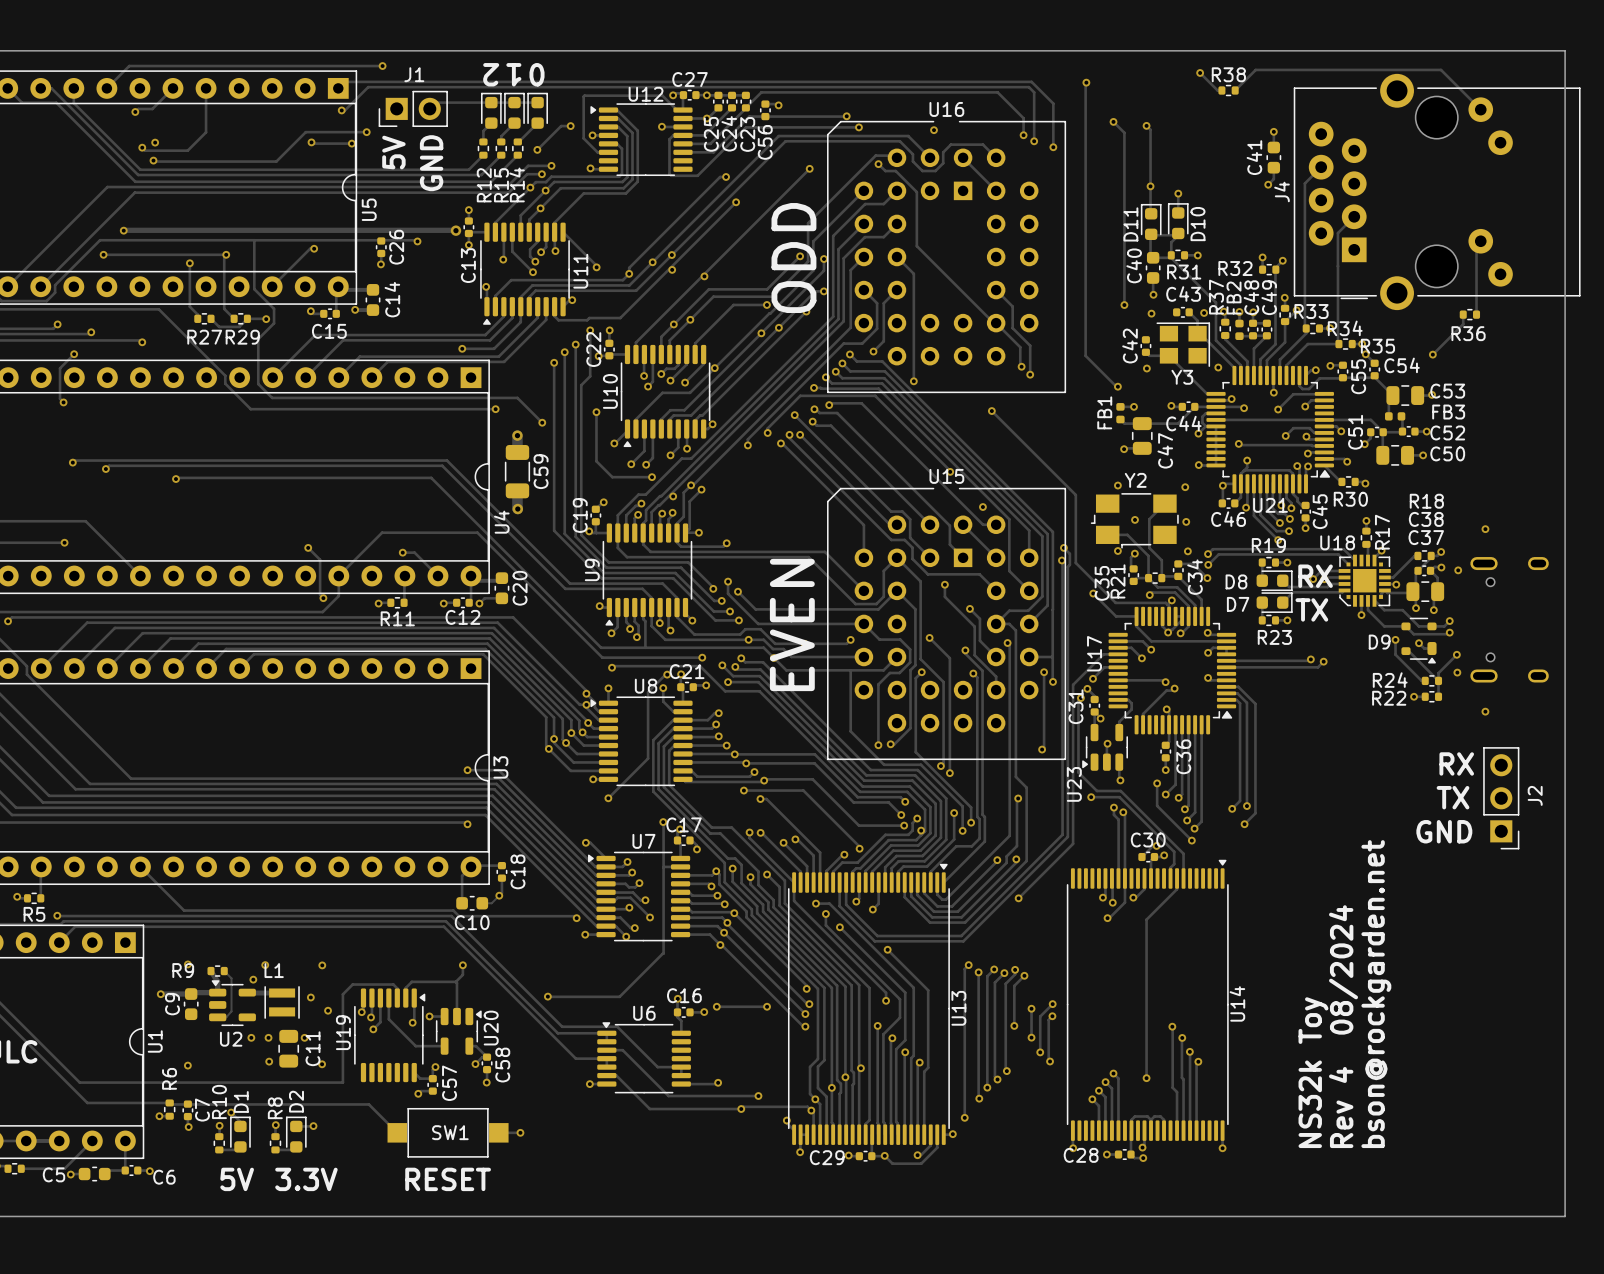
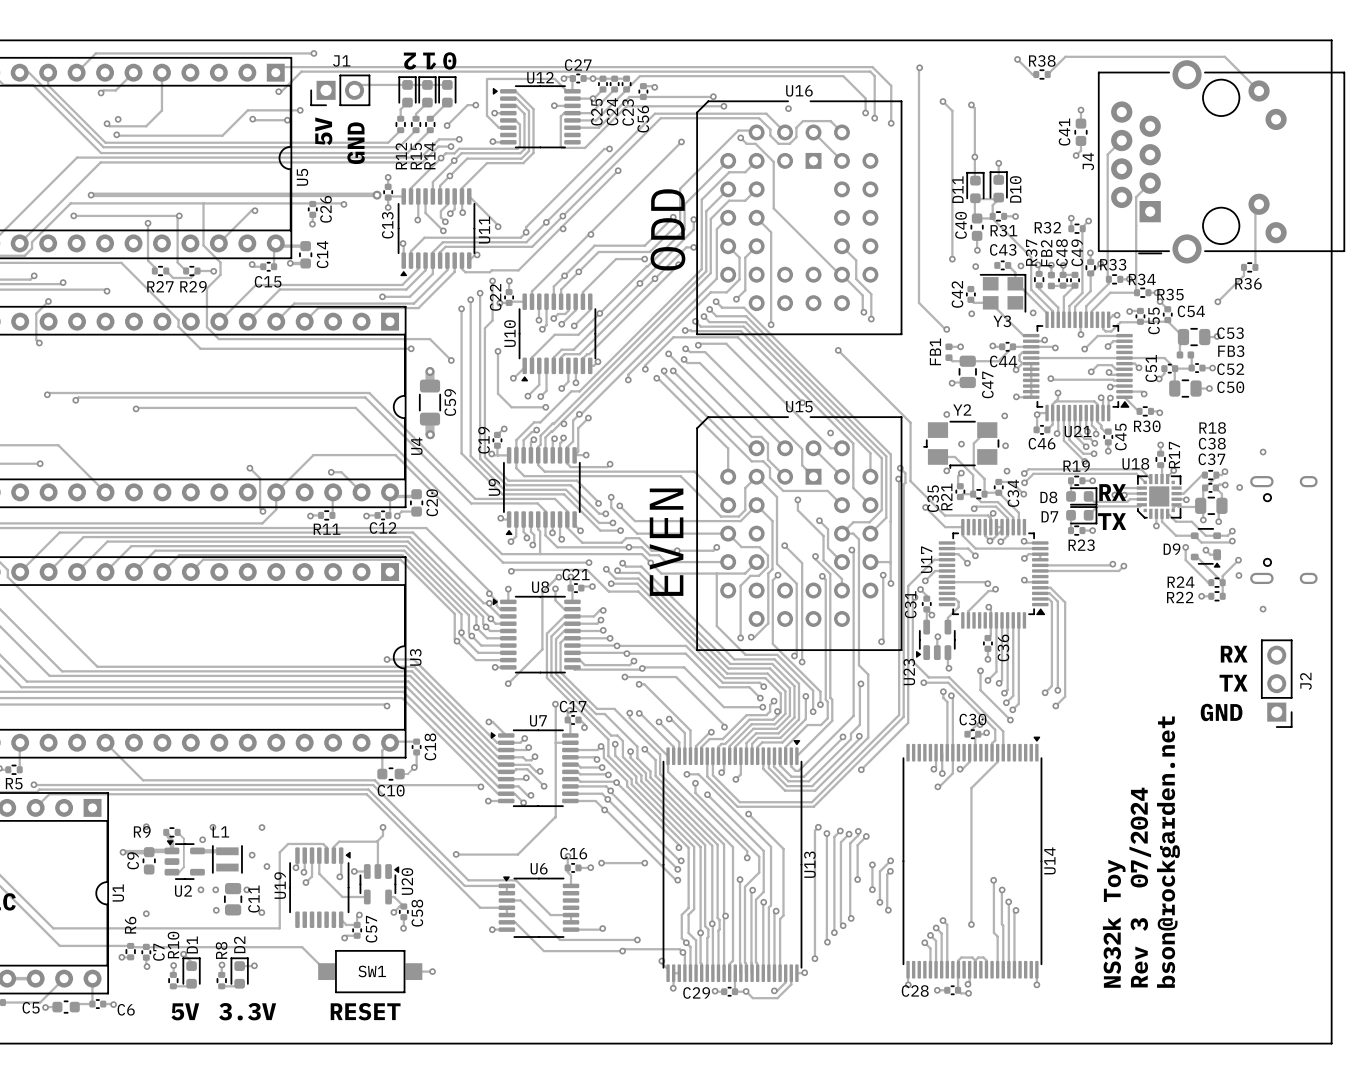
text: Rev 4 08/2024 (1343, 1026) -> Rev 3 07/2024 (1140, 887)

